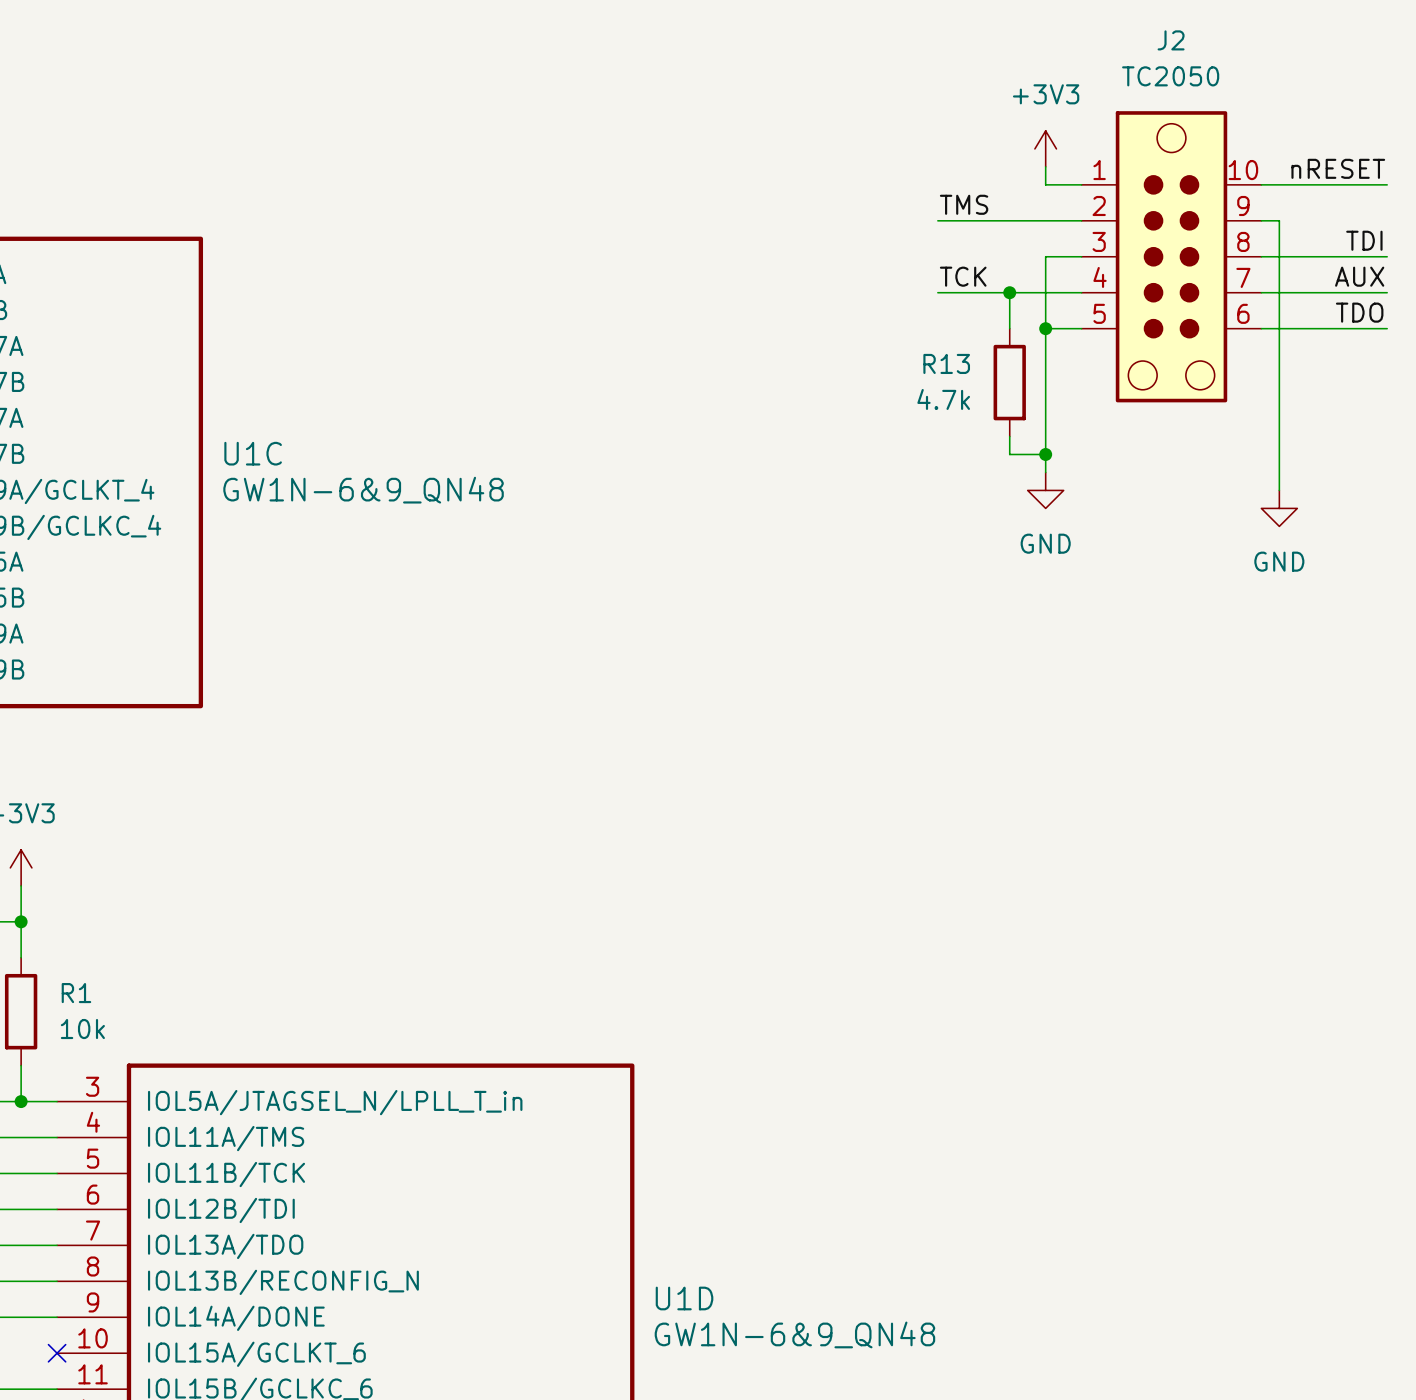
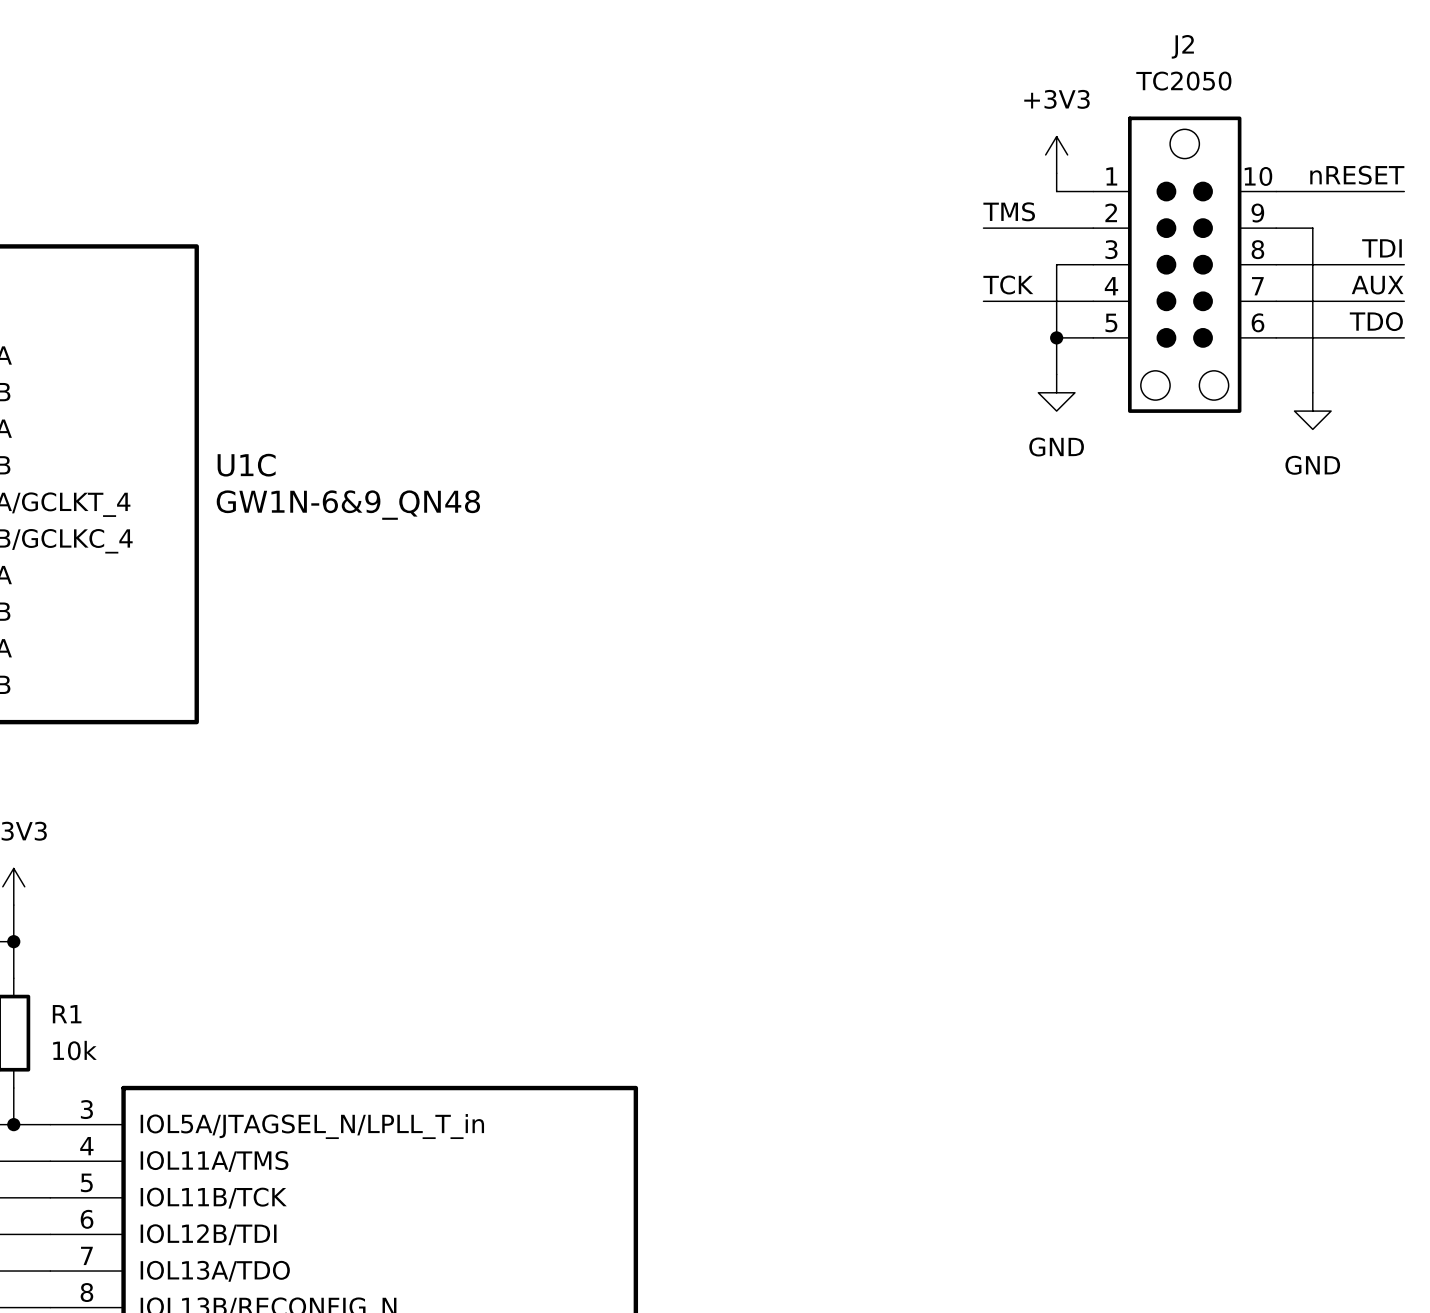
label position: TMS (964, 204) -> TMS (1009, 211)
wire: (937, 220) (973, 220) -> none
wire: (1279, 220) (1279, 490) -> (1294, 228) (1312, 228) (1312, 392)
label position: TCK (963, 276) -> TCK (1008, 284)
wire: (937, 292) (973, 292) -> none
wire: (1009, 292) (1009, 328) -> none
junction: (1009, 292) -> none
wire: (1045, 364) (1045, 472) -> none
R13: 4.7k (1009, 382) -> none
wire: (1009, 436) (1009, 454) (1045, 454) -> none
junction: (1045, 454) -> none
power symbol position: GND (1045, 490) -> GND (1056, 392)
power symbol position: GND (1279, 508) -> GND (1312, 411)

